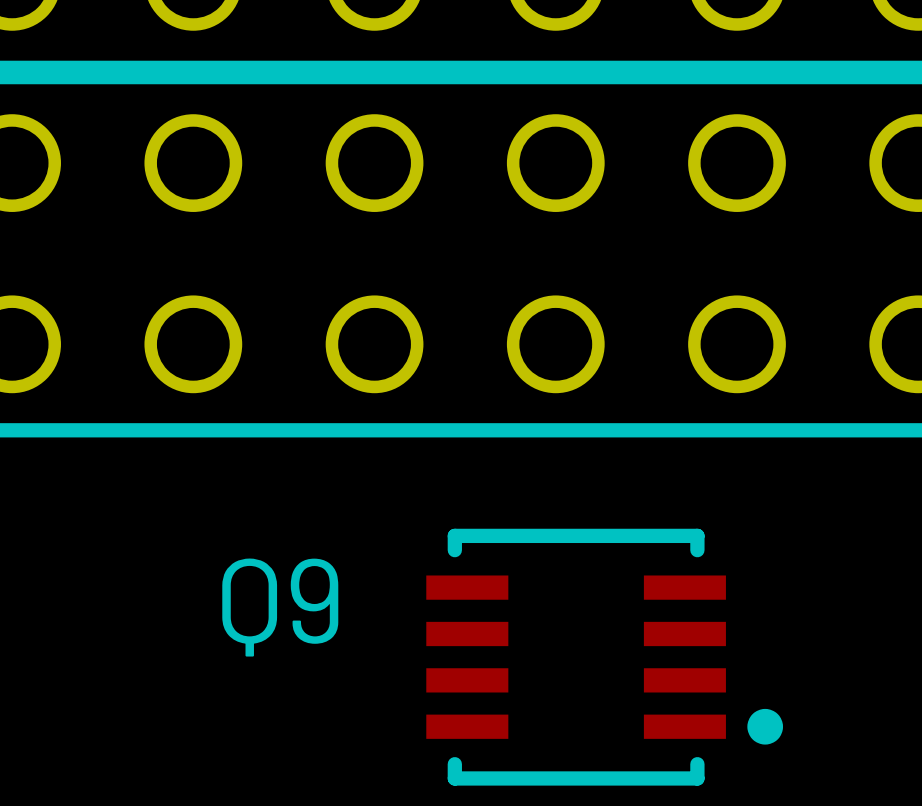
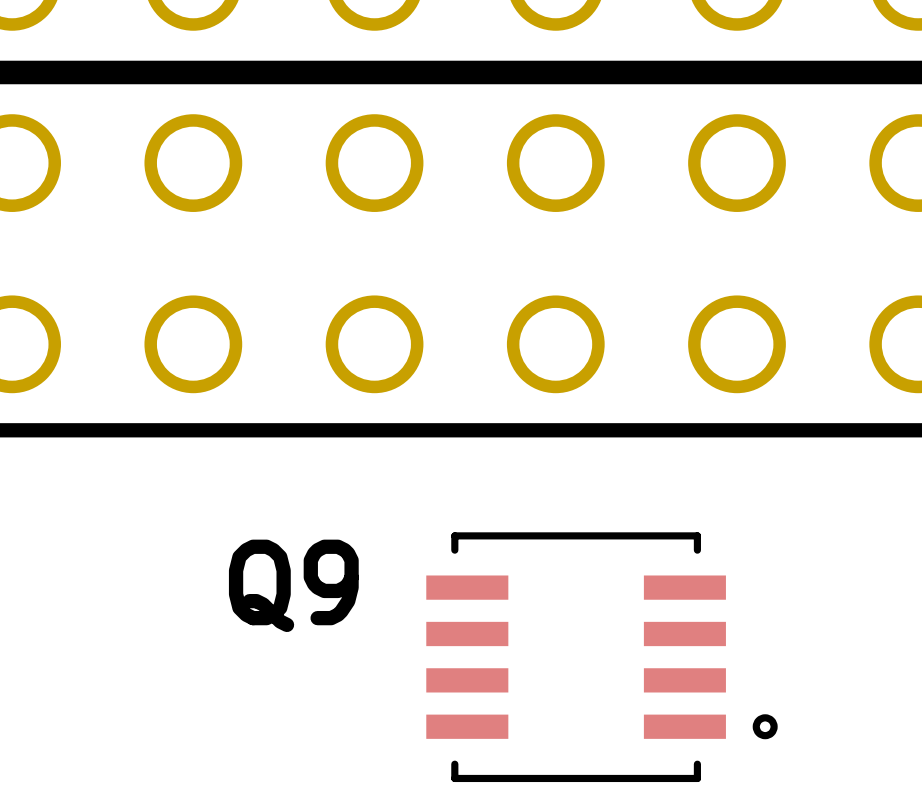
part footprint: [426, 528, 784, 786] -> [426, 532, 778, 783]

